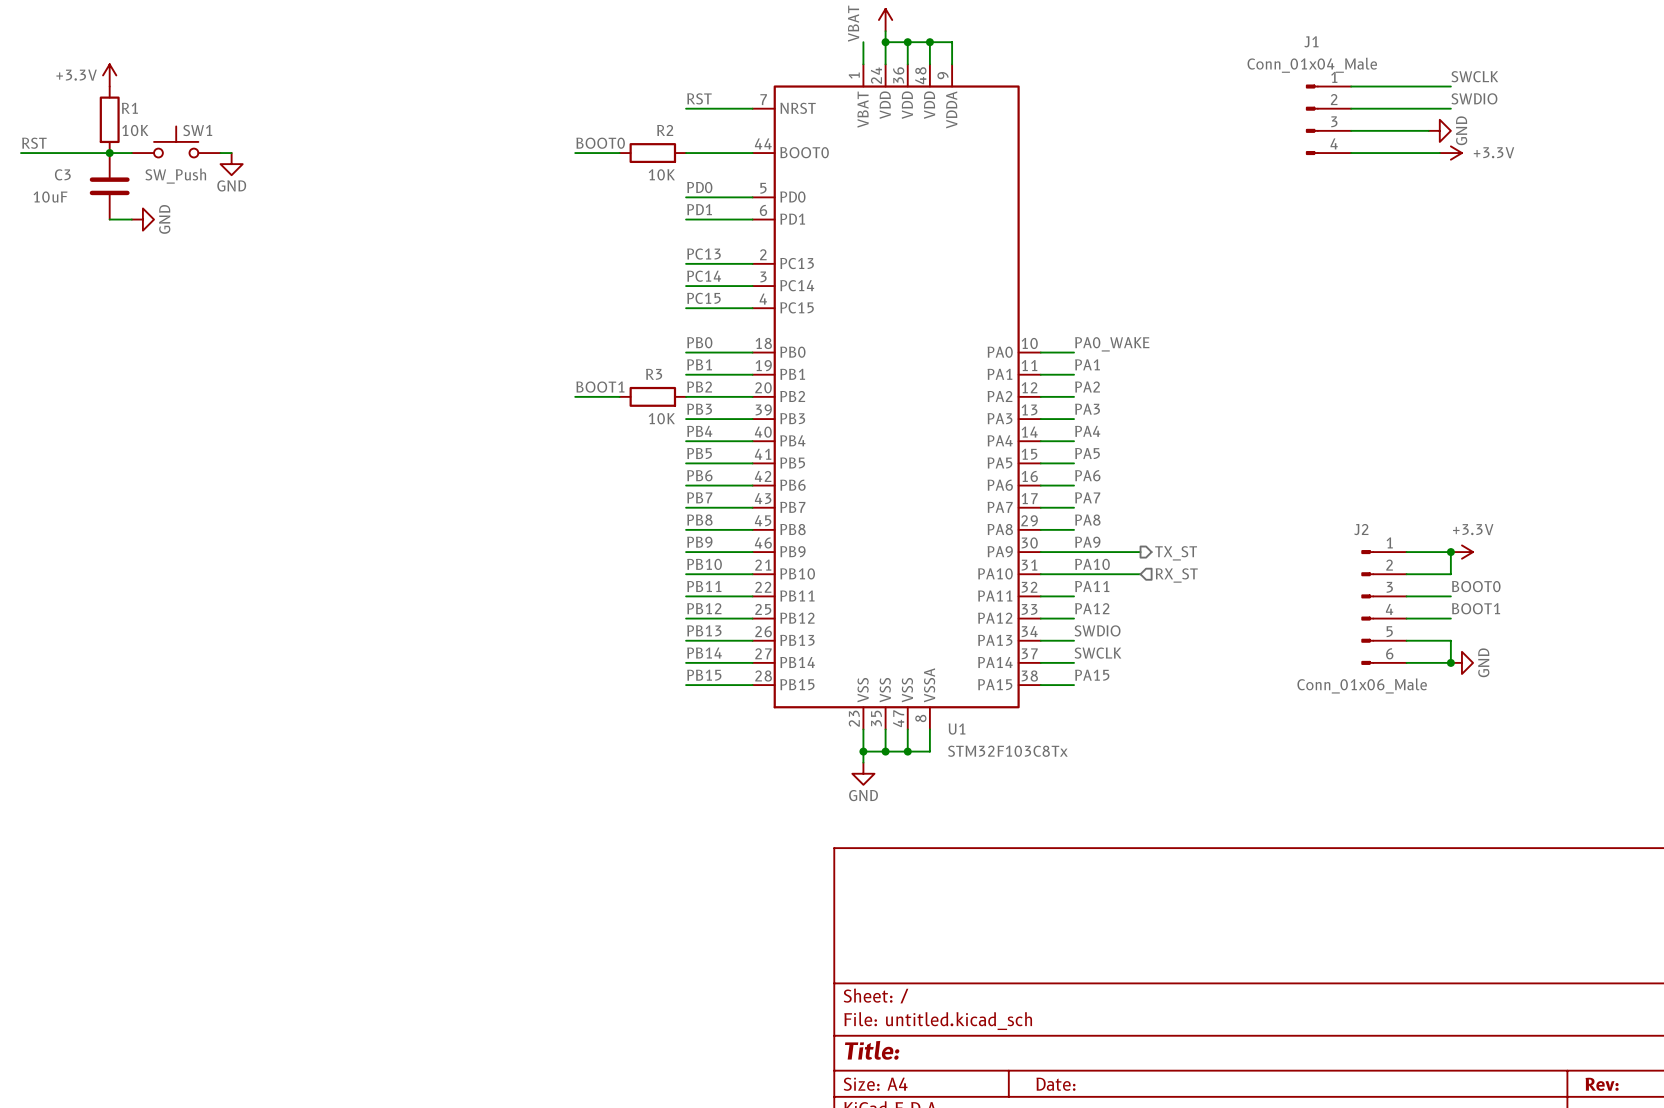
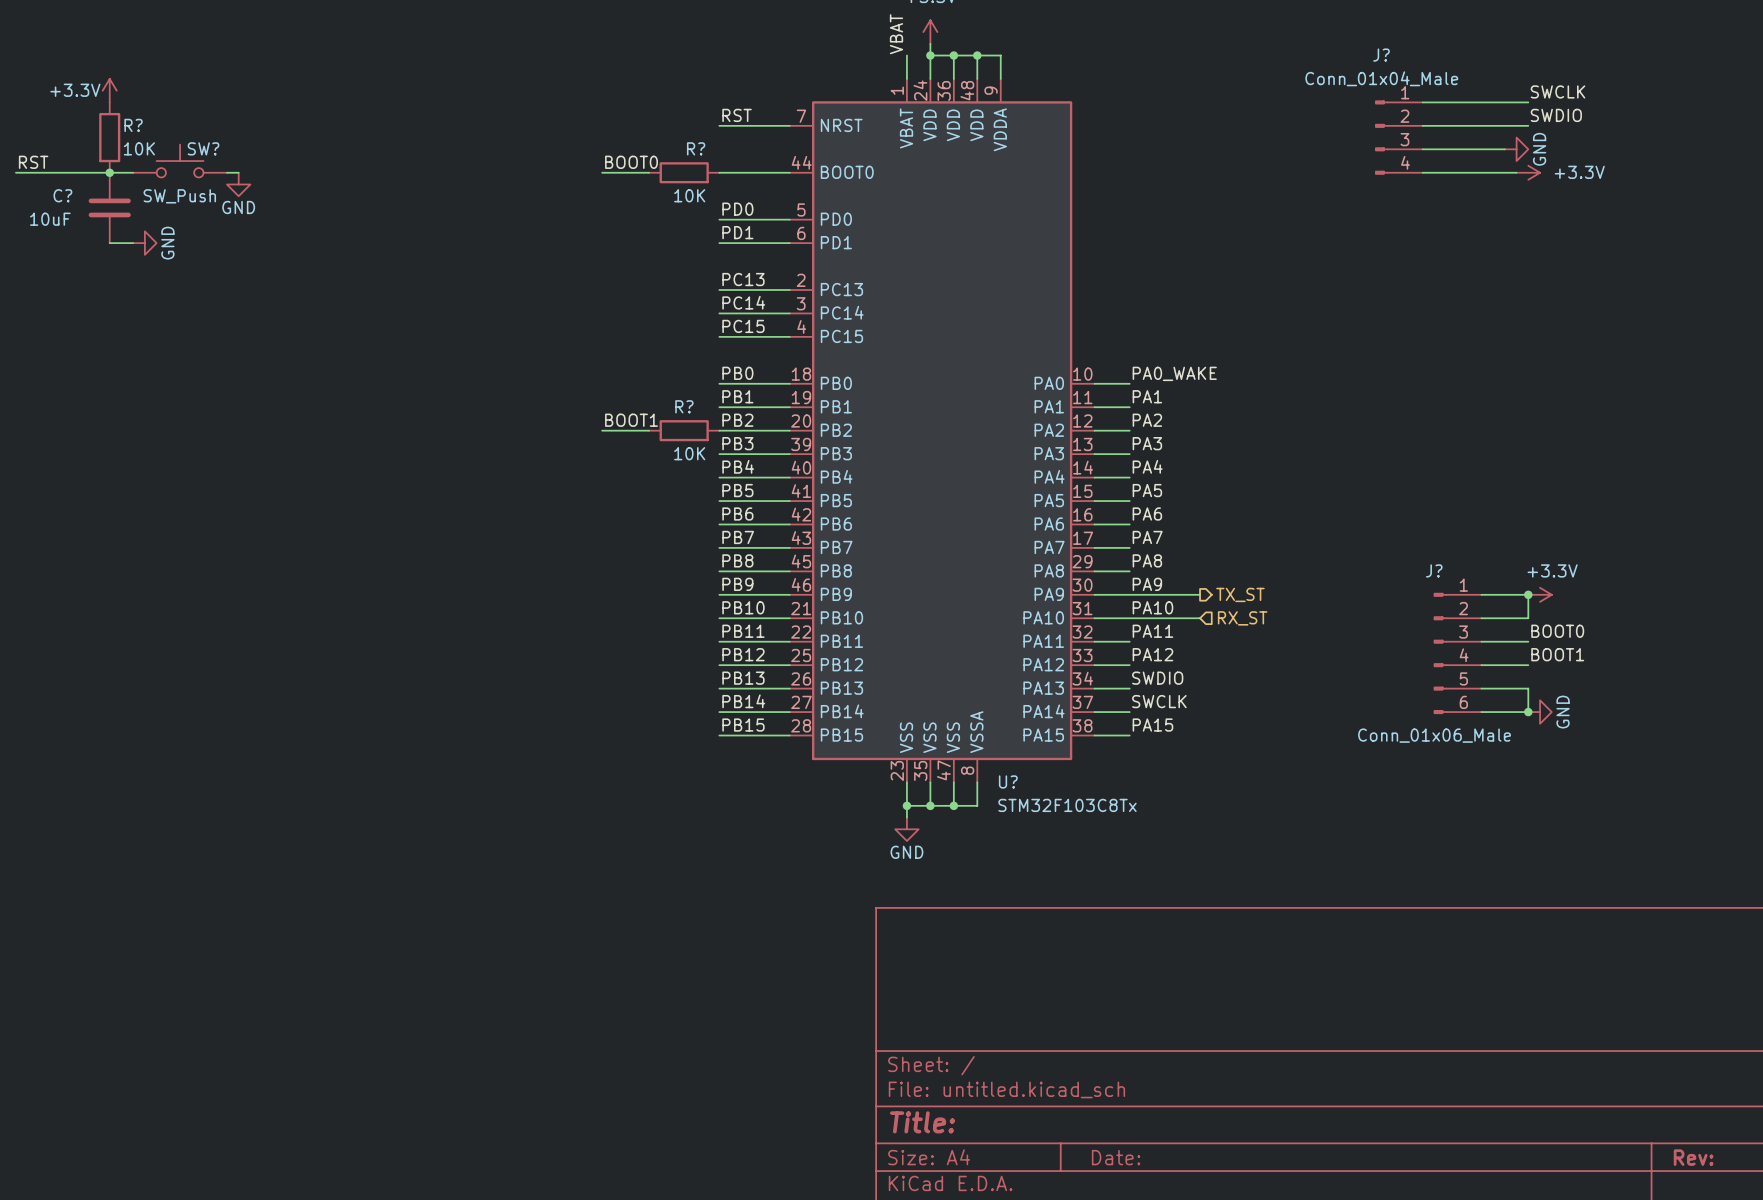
J1 name: J1 (1311, 41) -> J? (1381, 55)
R1 name: R1 (129, 108) -> R? (133, 125)
SW1 name: SW1 (197, 130) -> SW? (203, 148)
R2 name: R2 (665, 130) -> R? (696, 148)
C3 name: C3 (62, 174) -> C? (62, 195)
R3 name: R3 (654, 374) -> R? (684, 406)
J2 name: J2 (1361, 529) -> J? (1434, 570)
U1 name: U1 (957, 729) -> U? (1008, 781)

